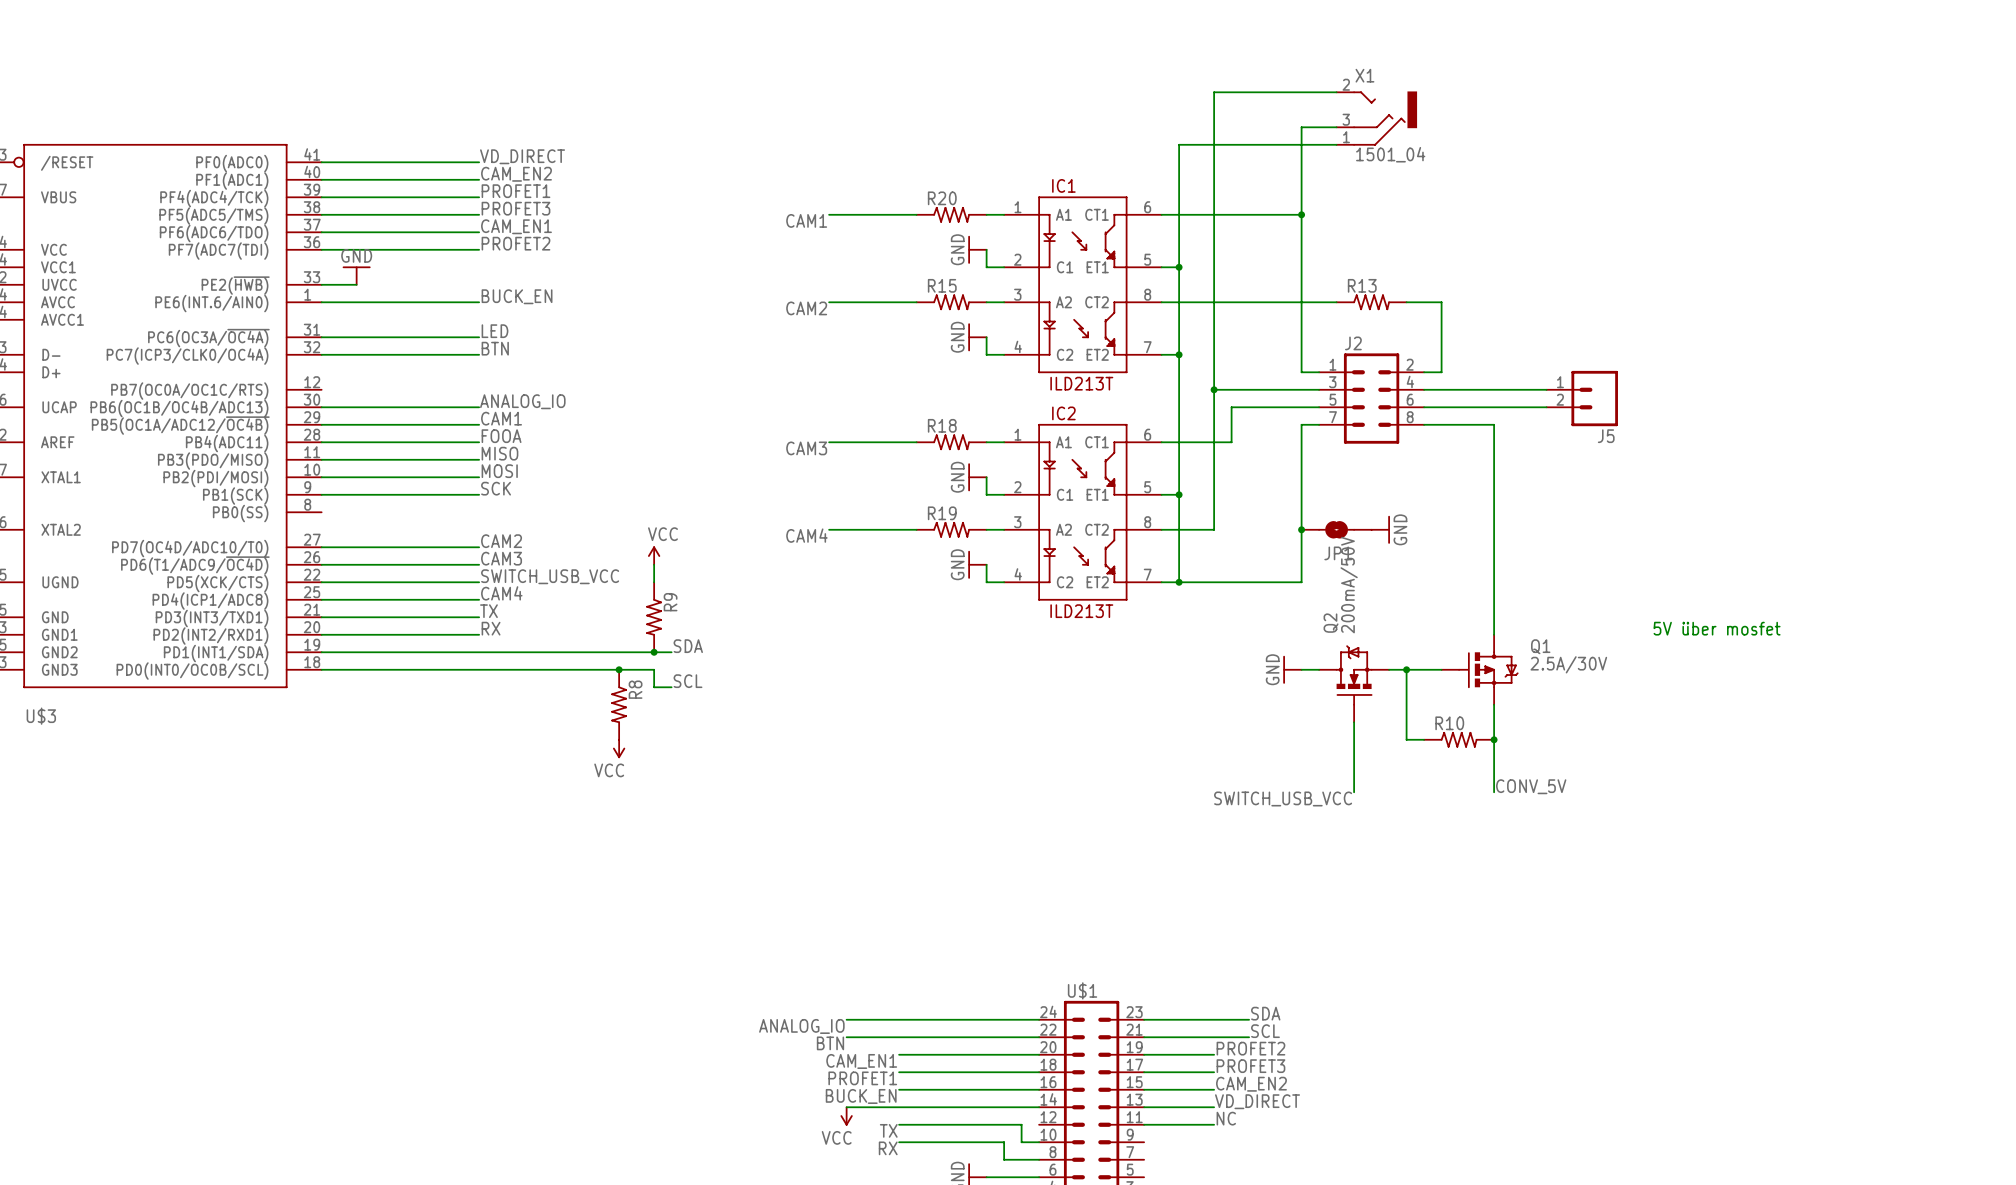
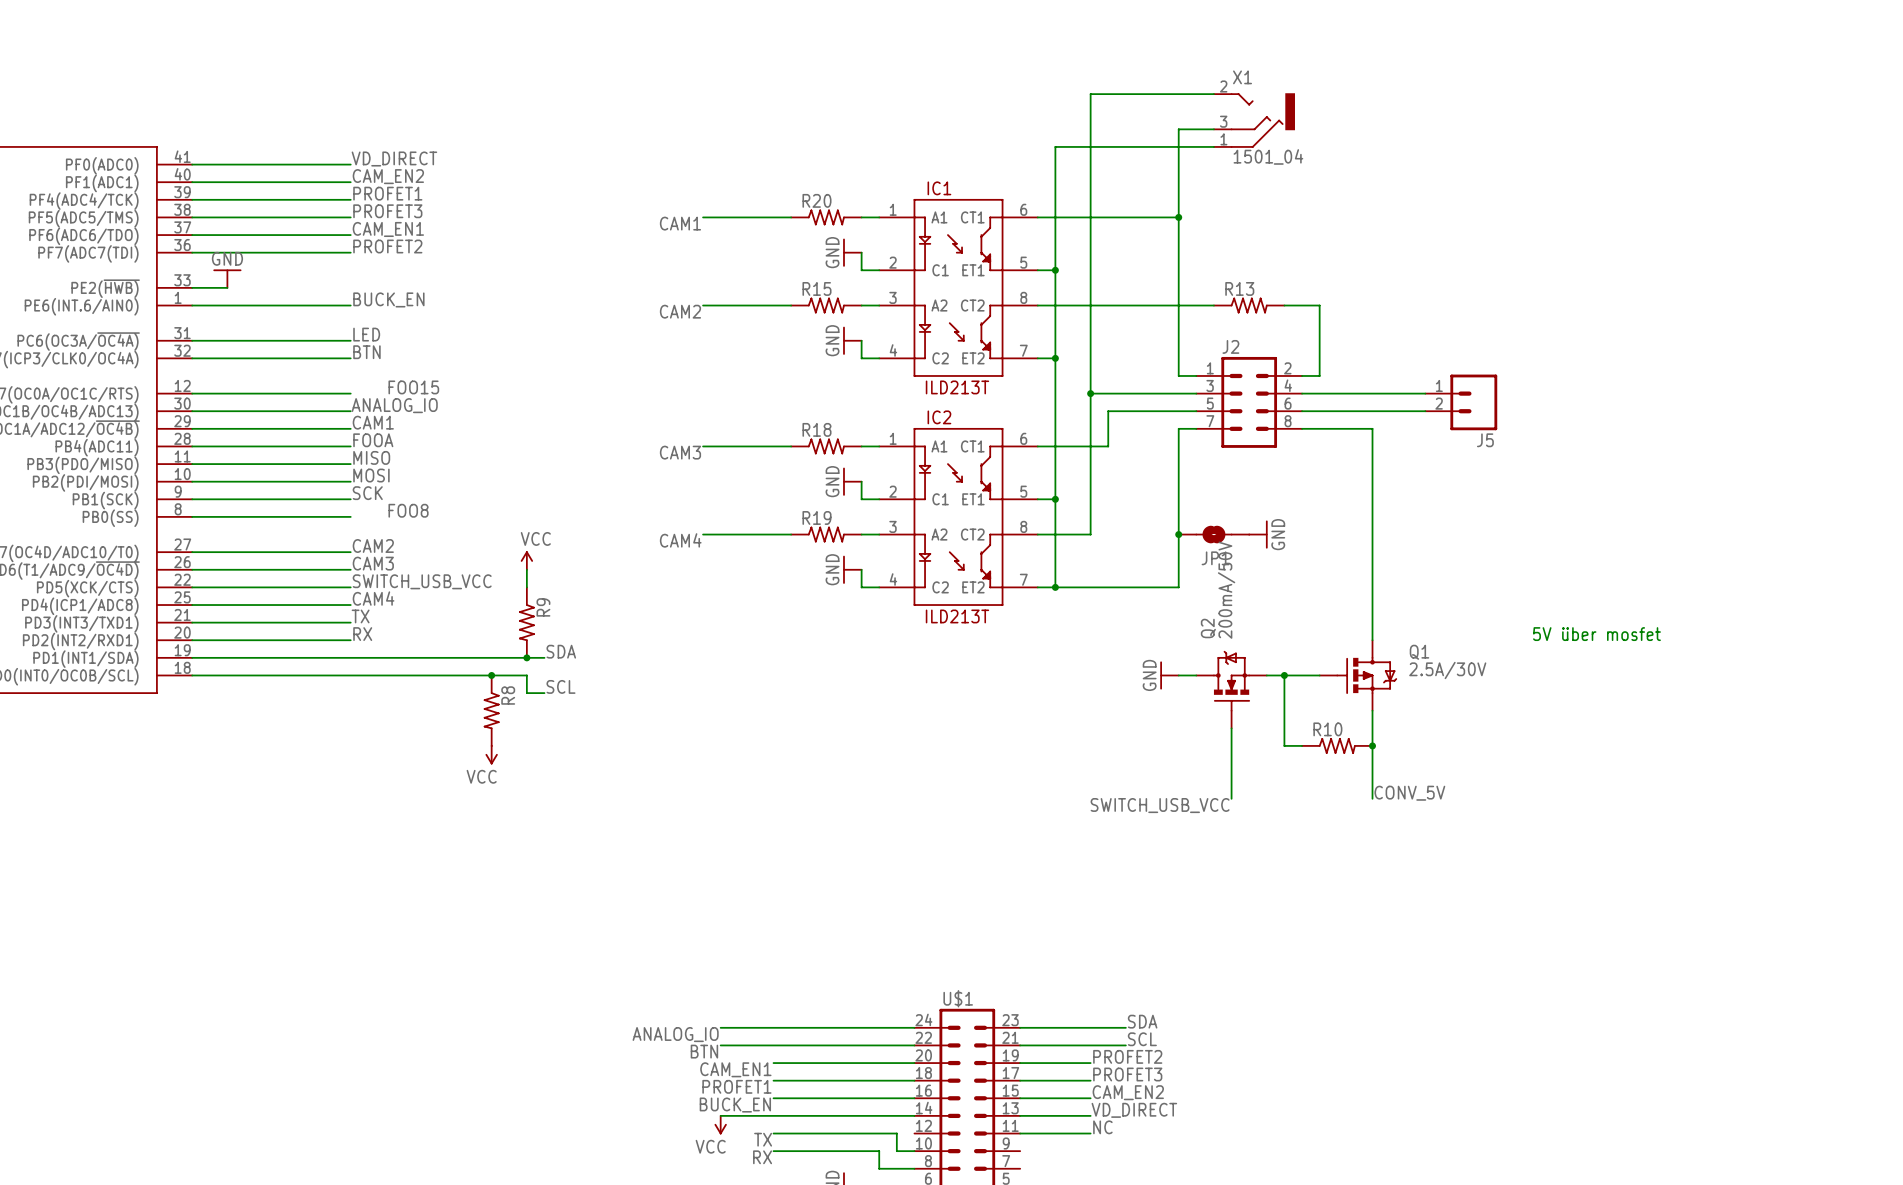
label: none -> FOO15 (413, 387)
wire: none -> (192, 393) (350, 393)
label: none -> FOO8 (408, 510)
wire: none -> (192, 516) (350, 516)

